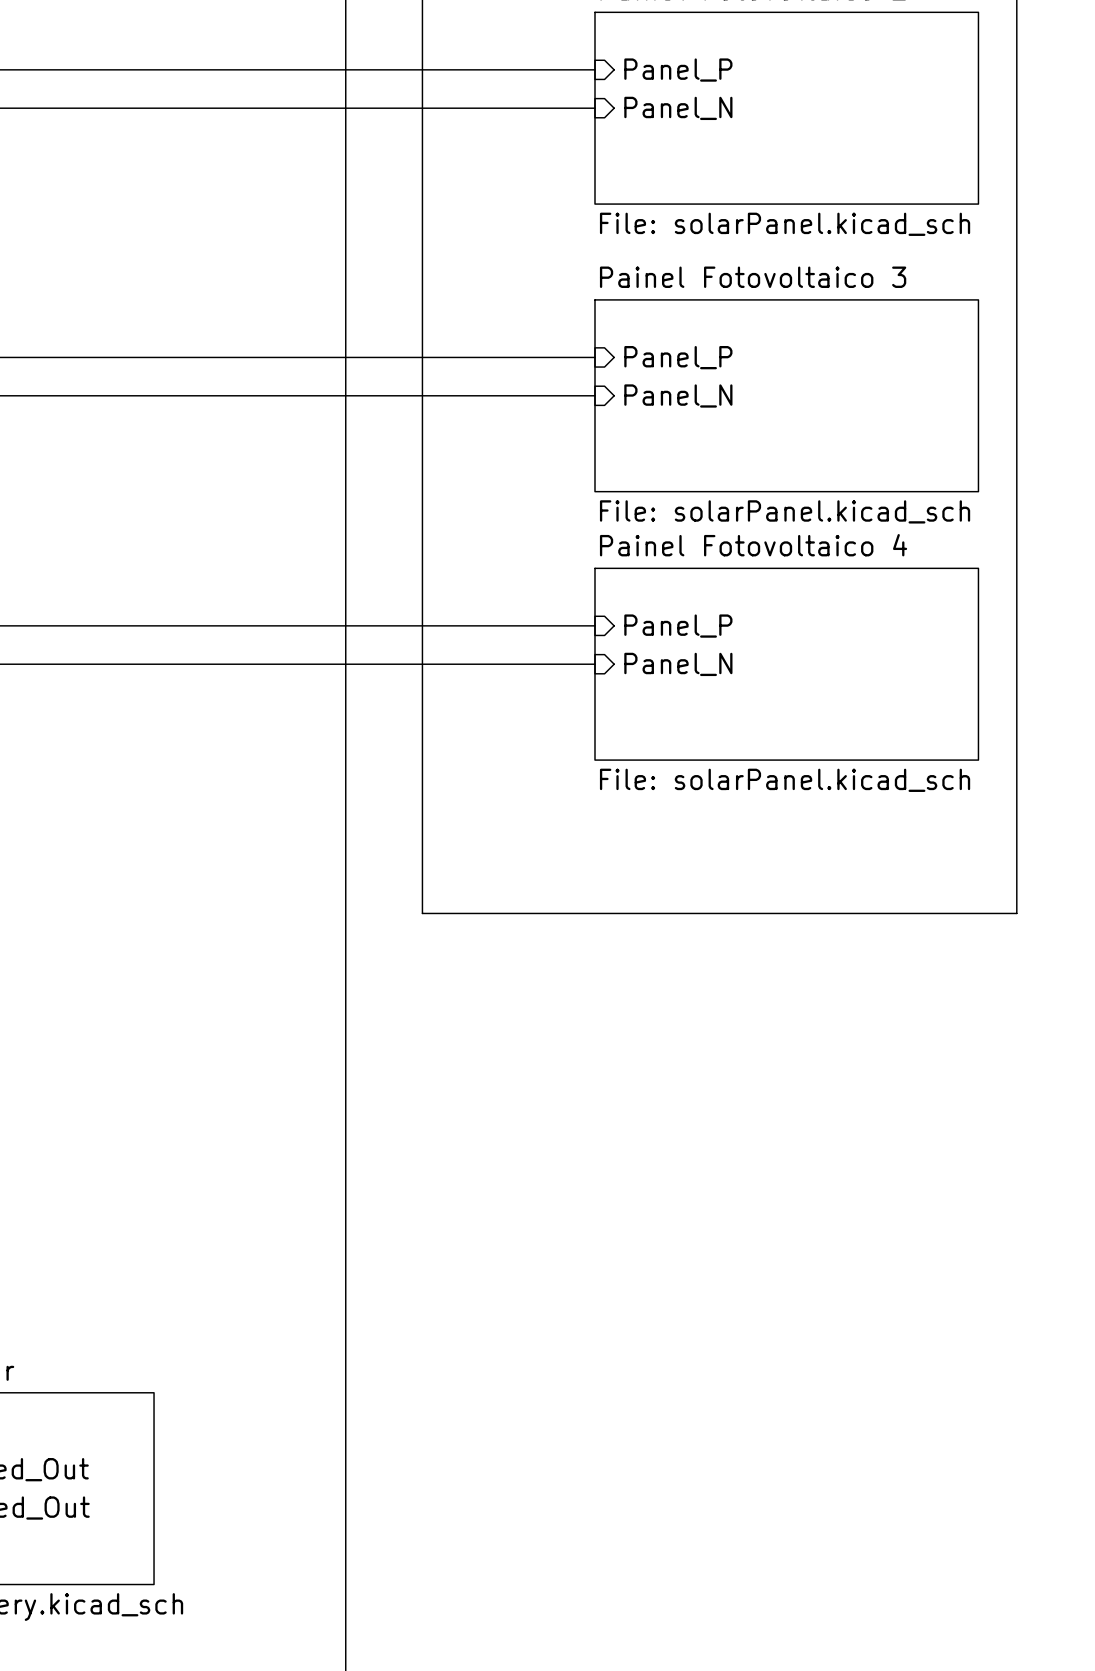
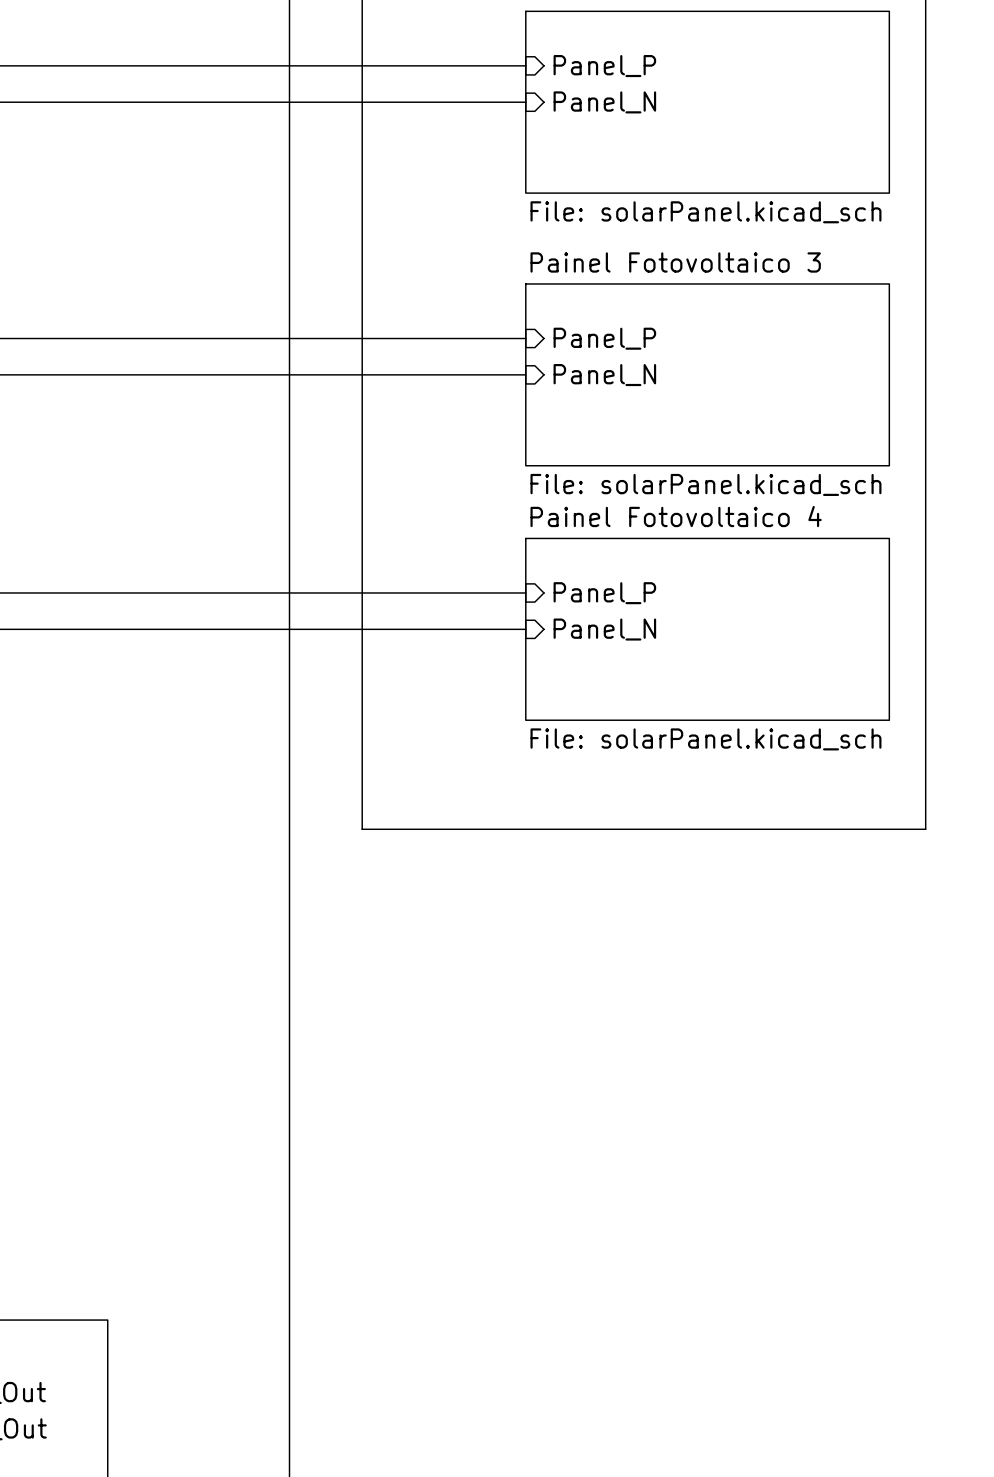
line: (422, 875) (422, 913) (1016, 913) (1016, 875) -> (362, 829) (925, 829)

